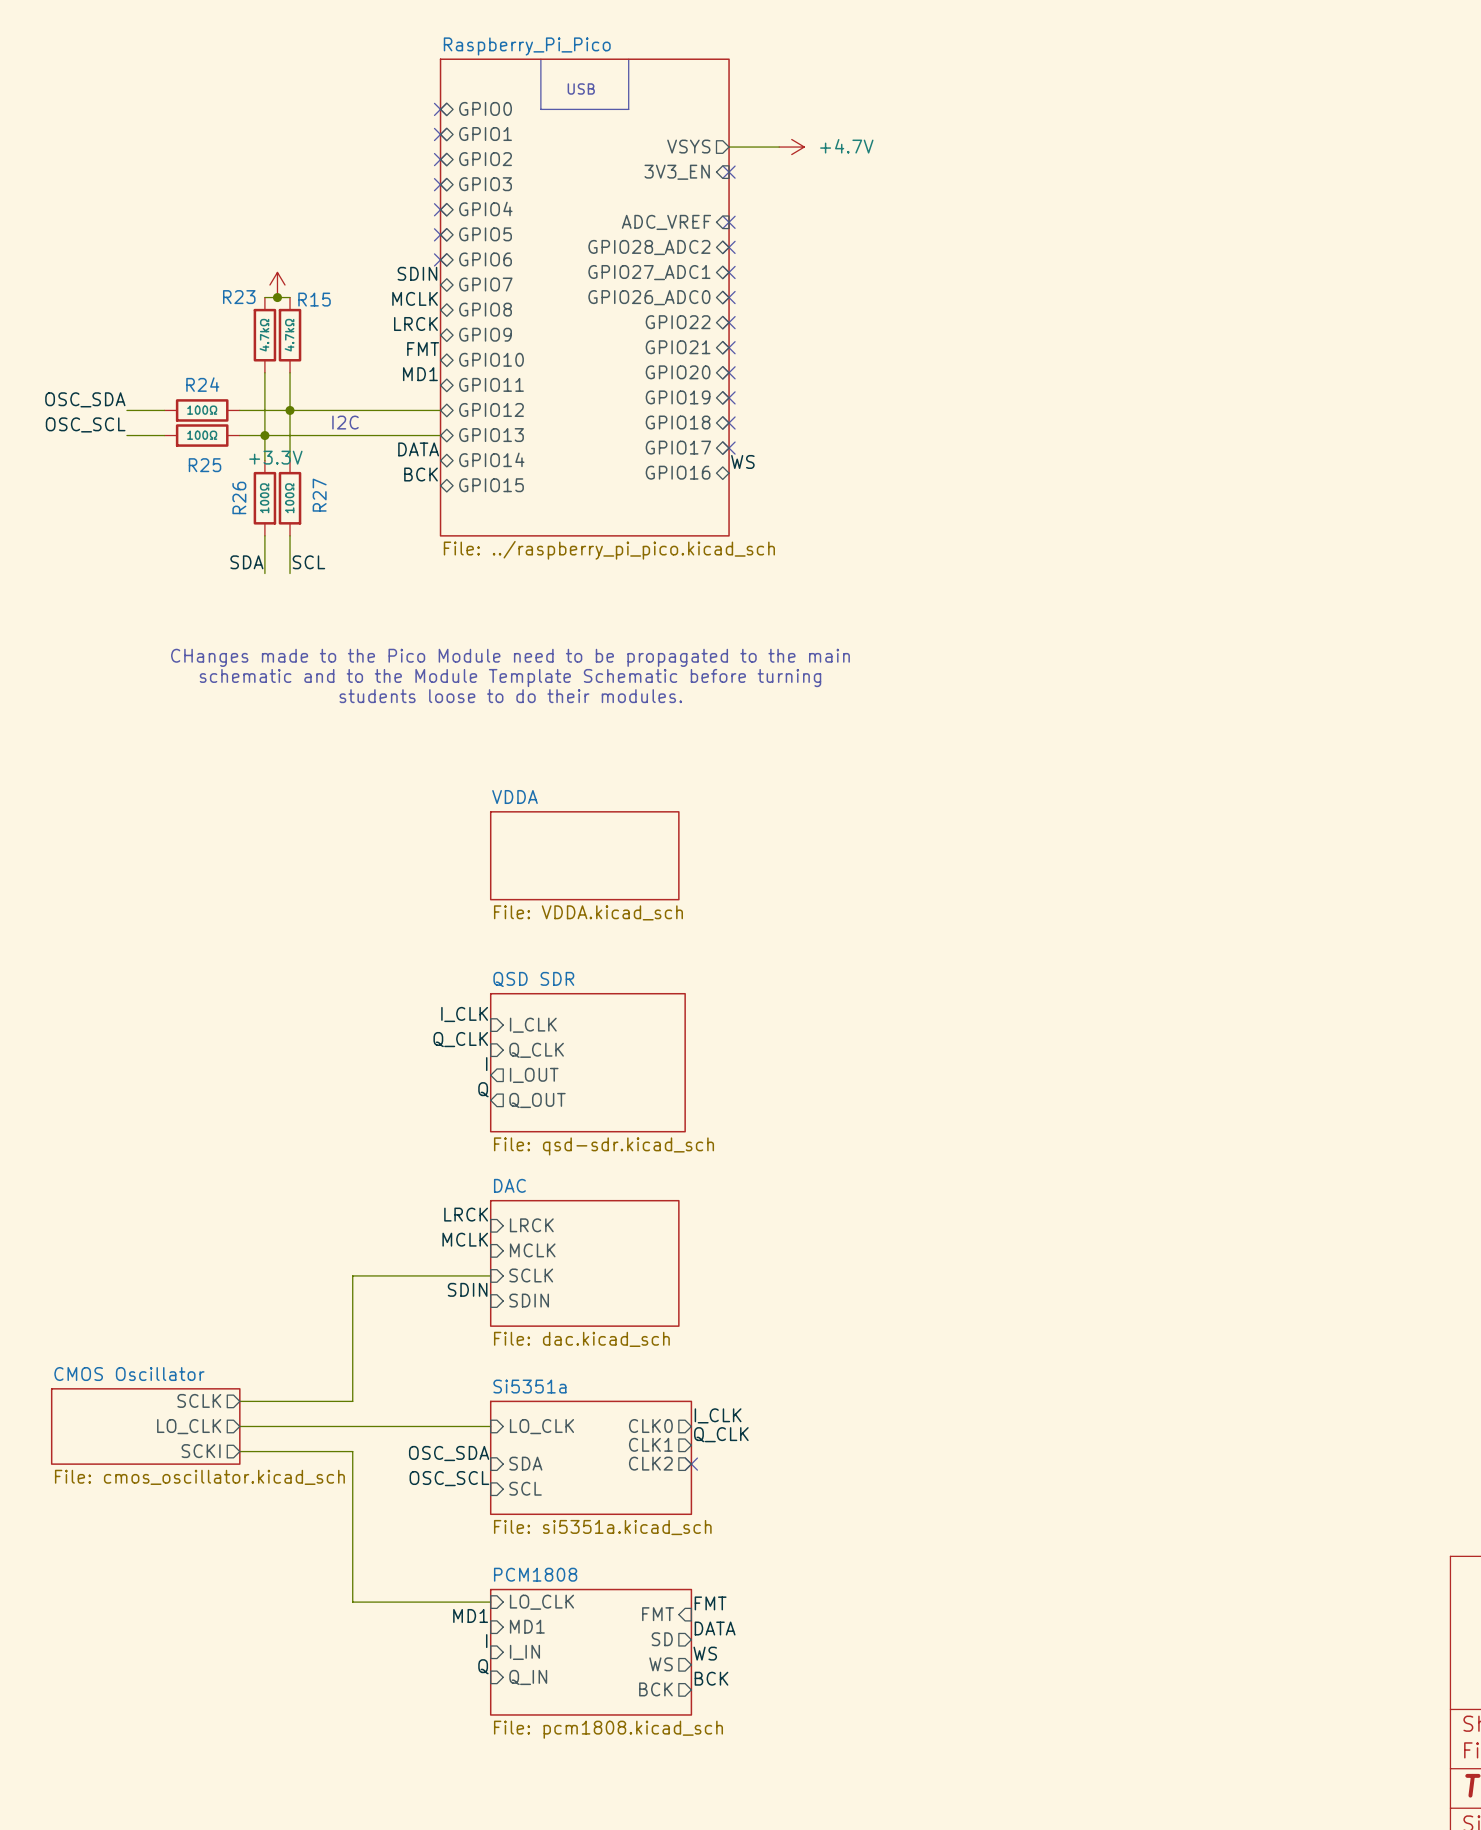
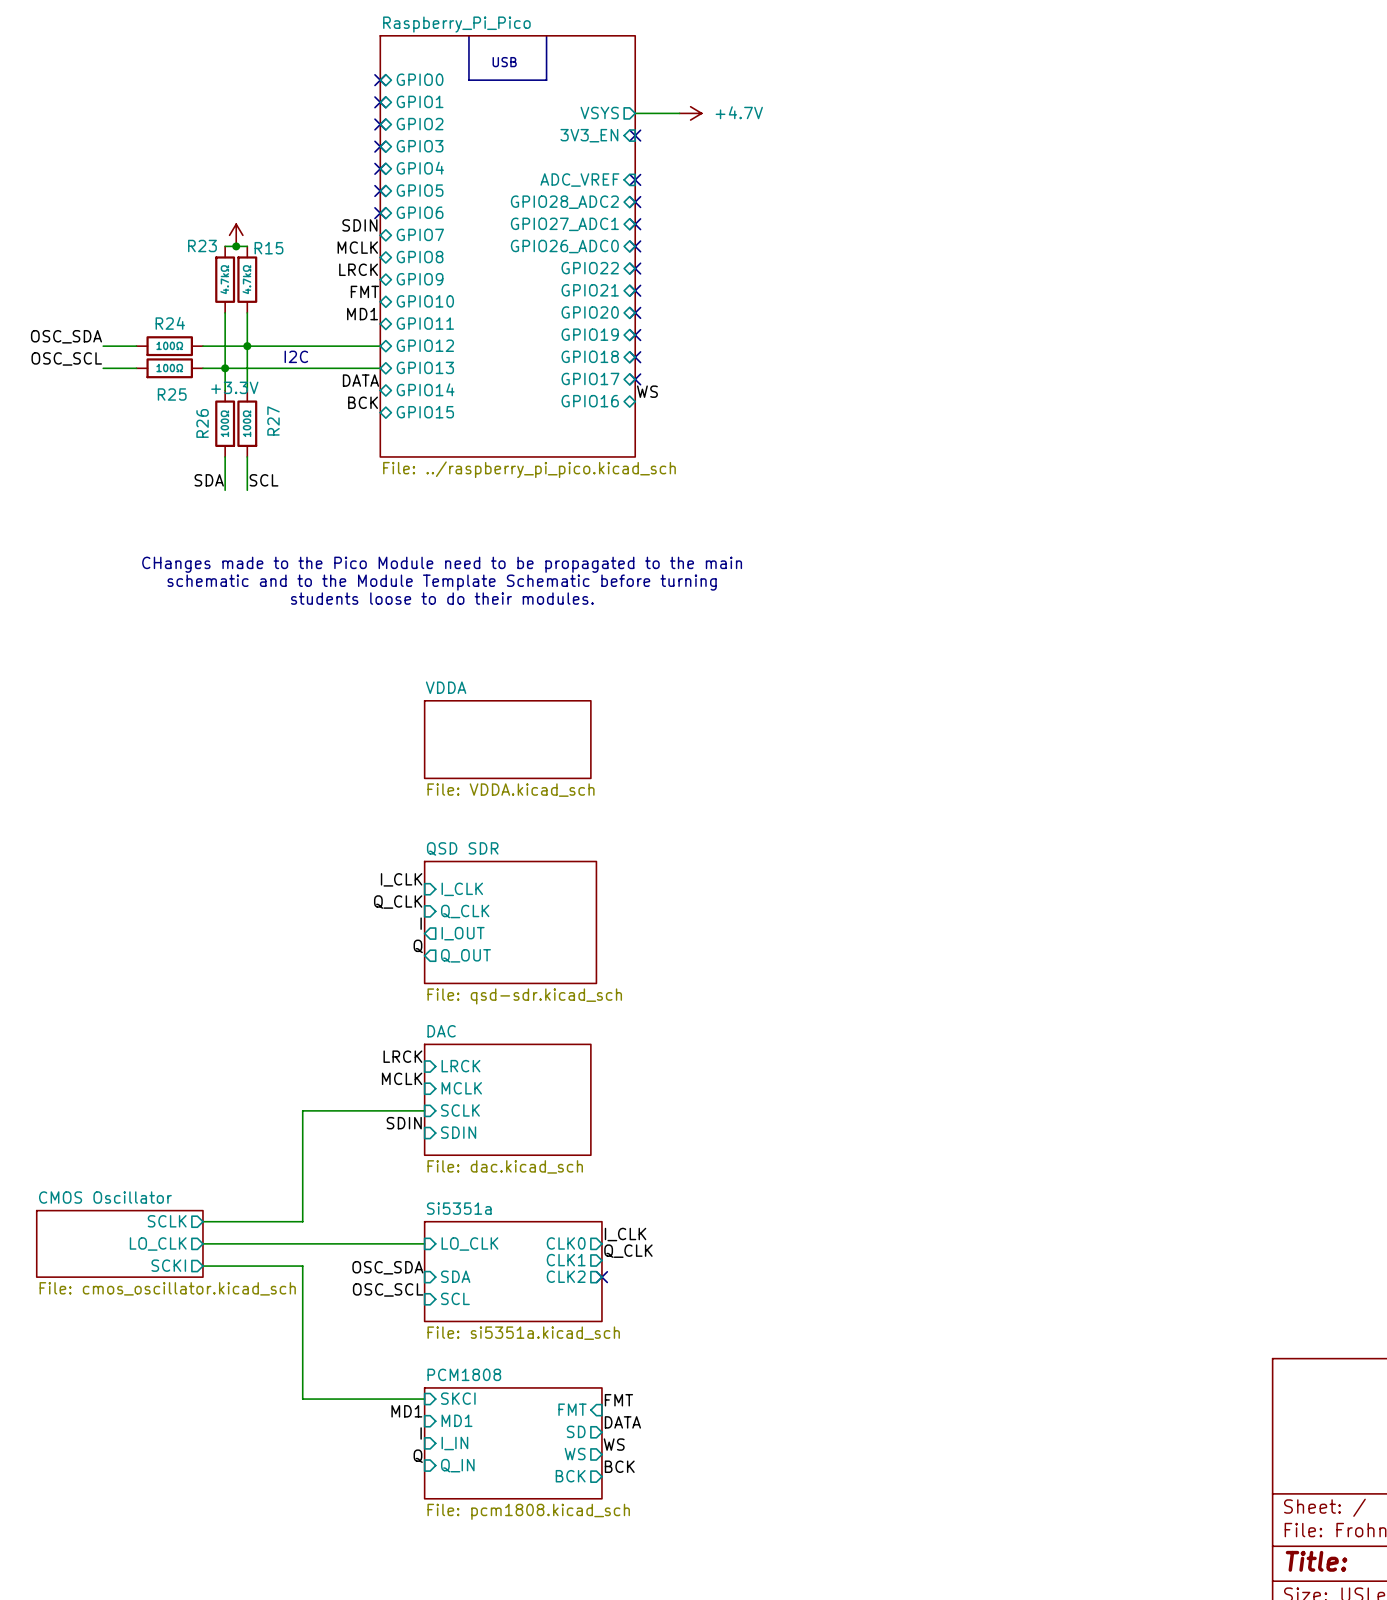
sheet pin: LO_CLK (541, 1602) -> SKCI (458, 1398)

